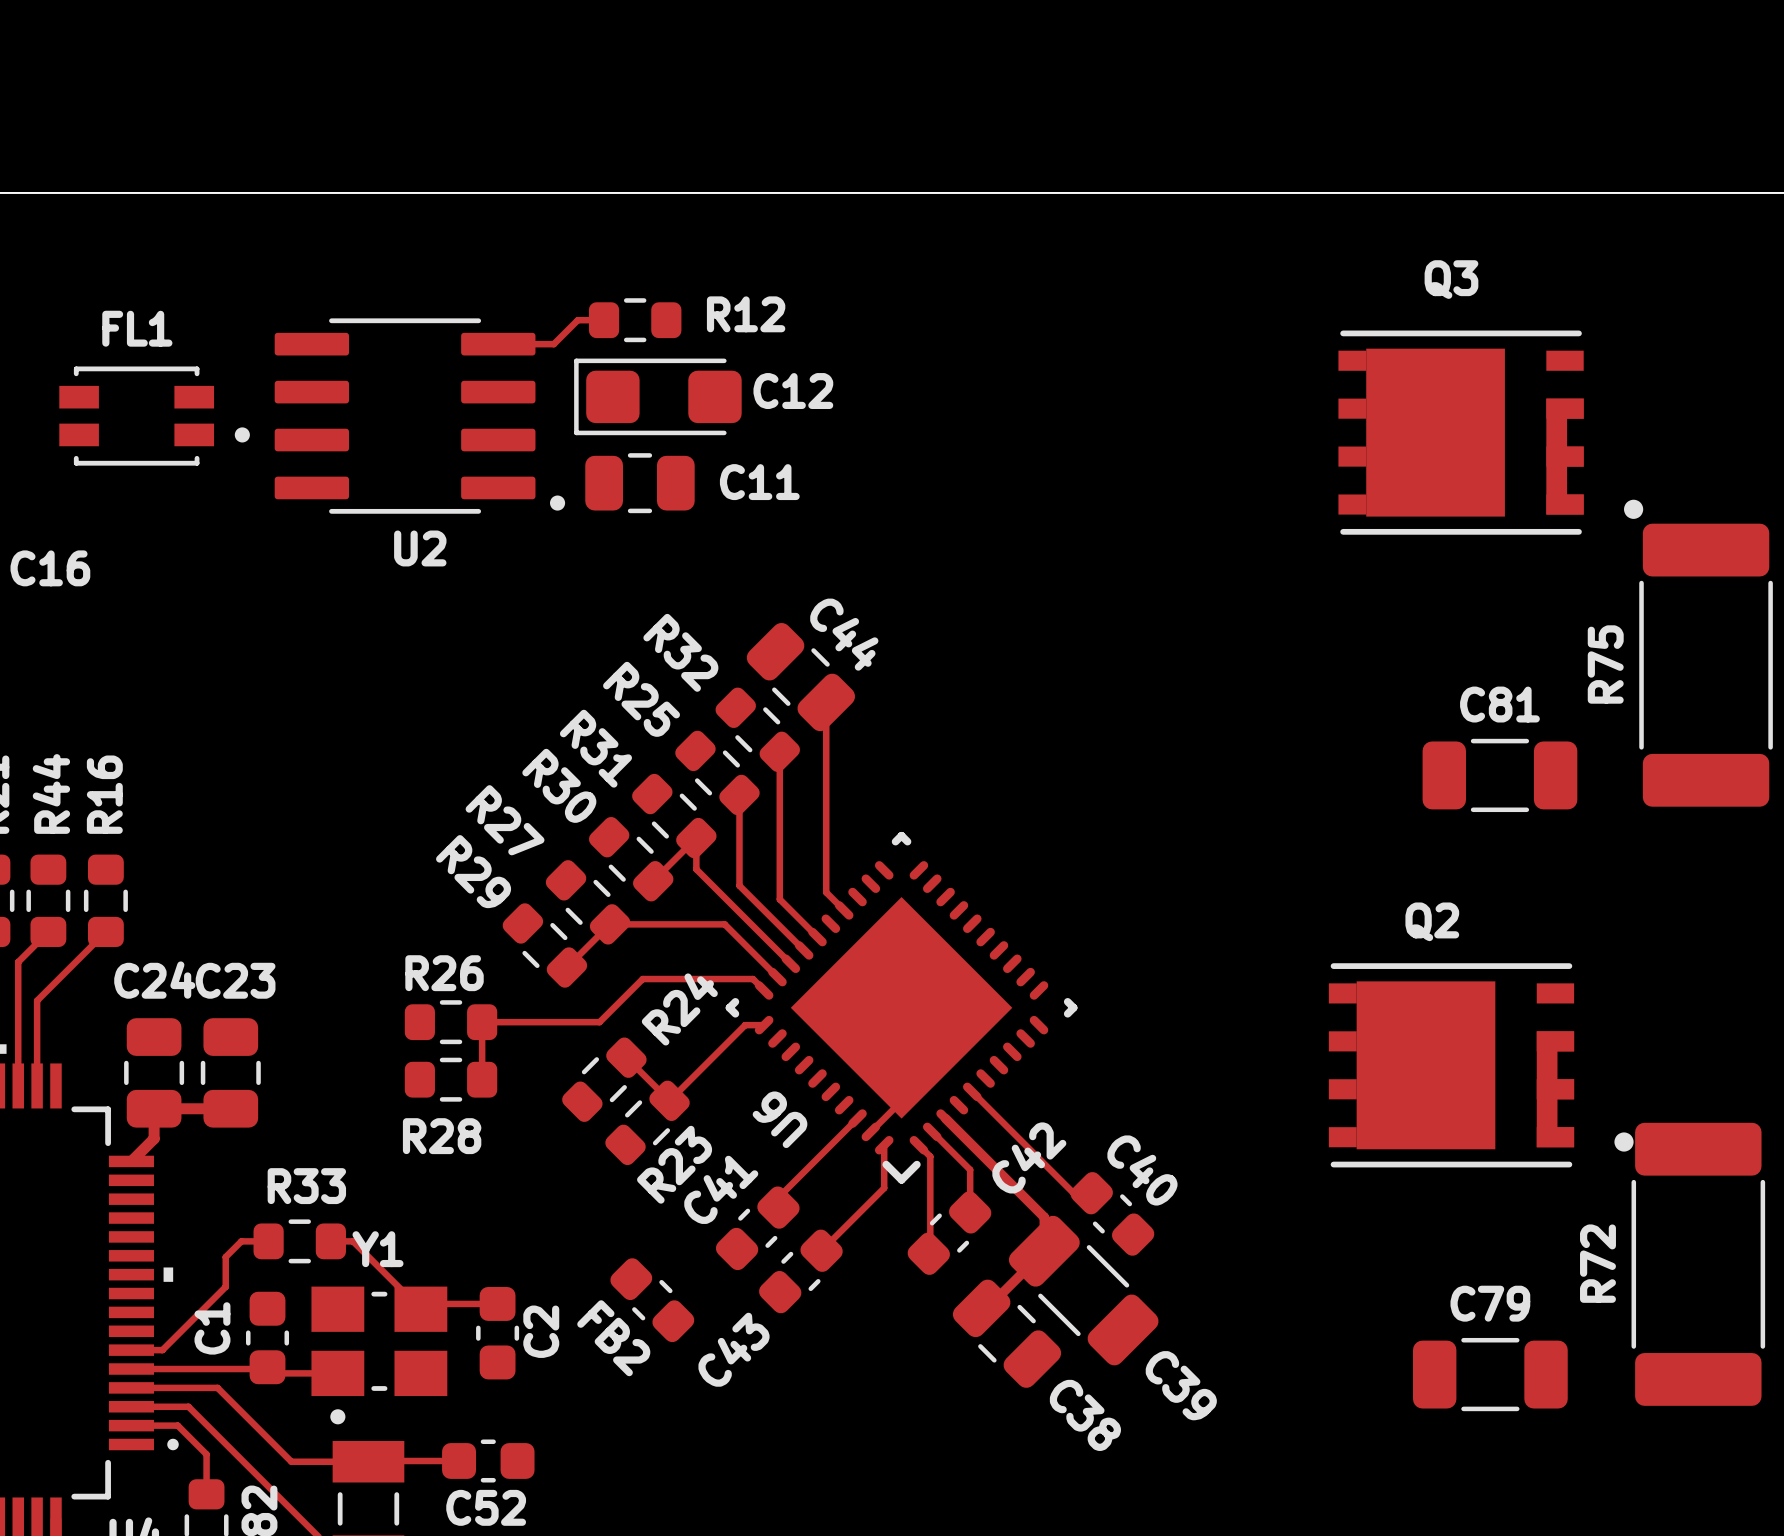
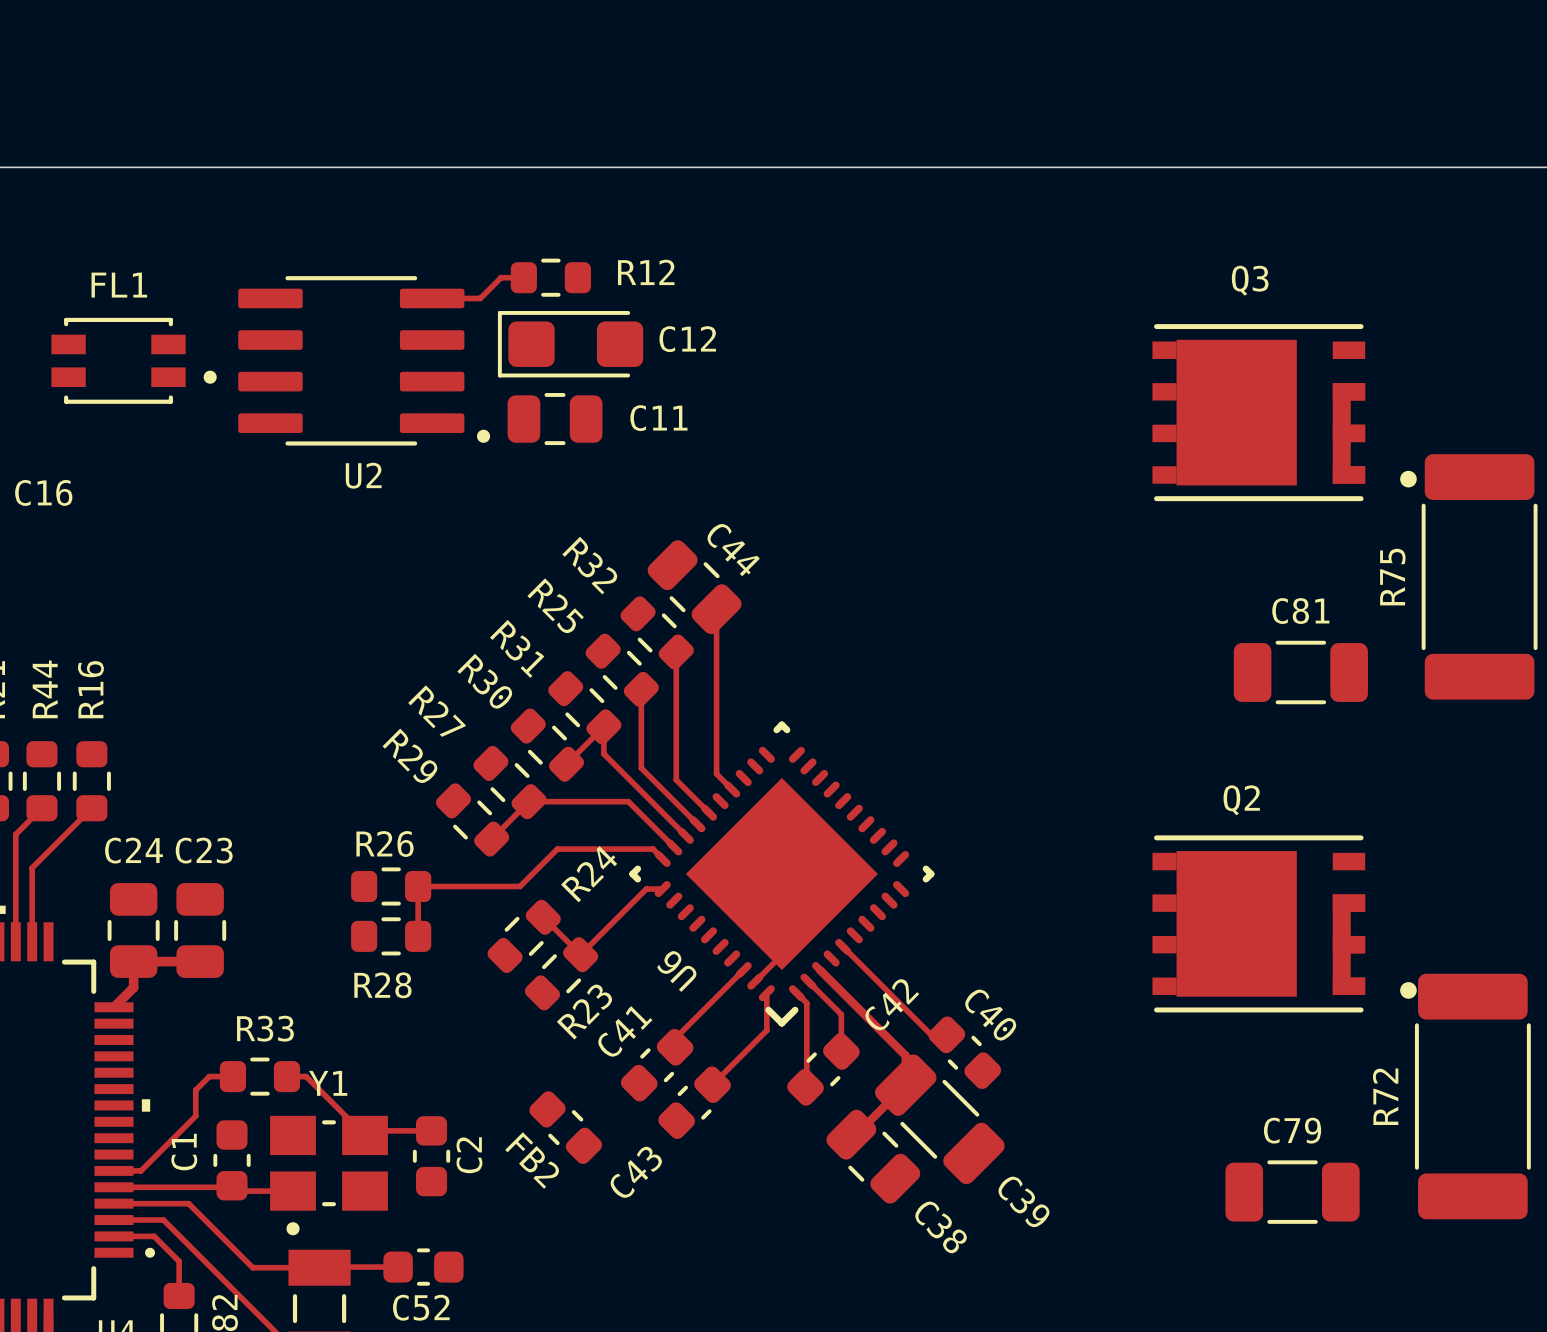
Q3 position: (1490, 432) -> (1284, 412)

